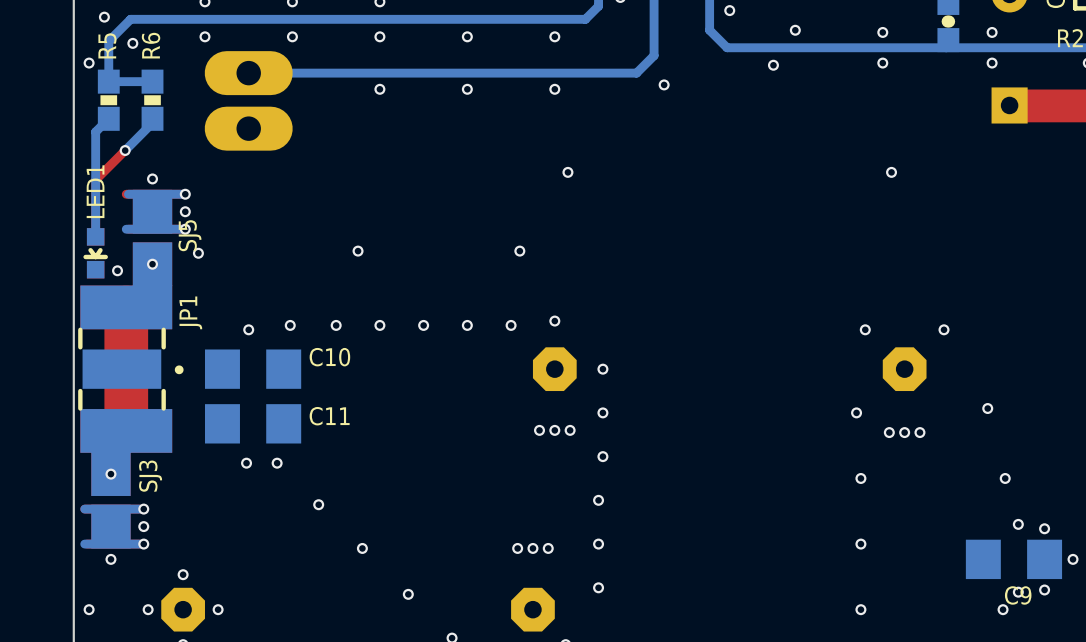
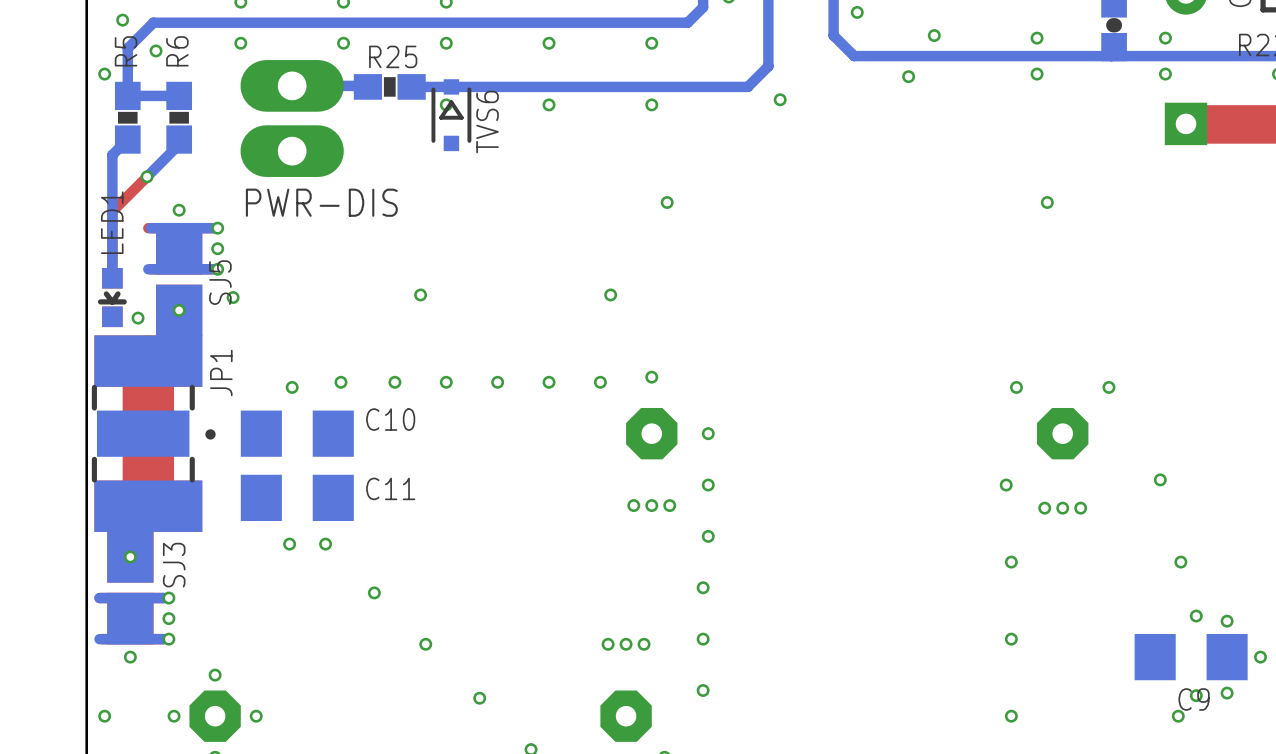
bottom track: (654, 55) (636, 73) (312, 73) -> (768, 65) (747, 86) (411, 86)
R25: none -> (389, 86)
TVS6: none -> (451, 115)
text: none -> PWR-DIS (321, 202)

